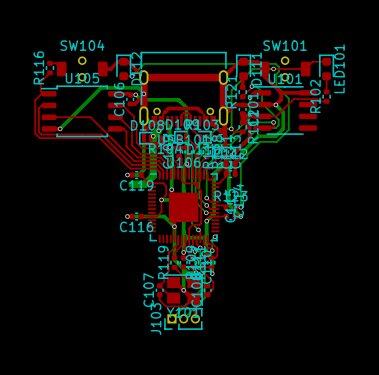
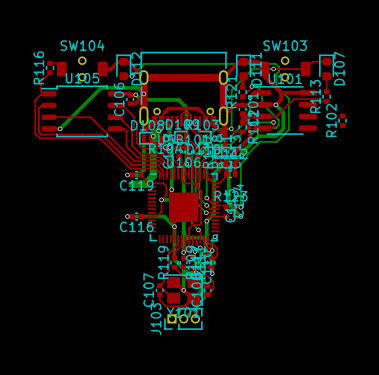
SW101 name: SW101 (285, 45) -> SW103 (285, 45)
LED101 name: LED101 (339, 68) -> D107 (339, 68)
R102 name: R102 (315, 96) -> R113 (315, 96)
R102: none -> (342, 120)

